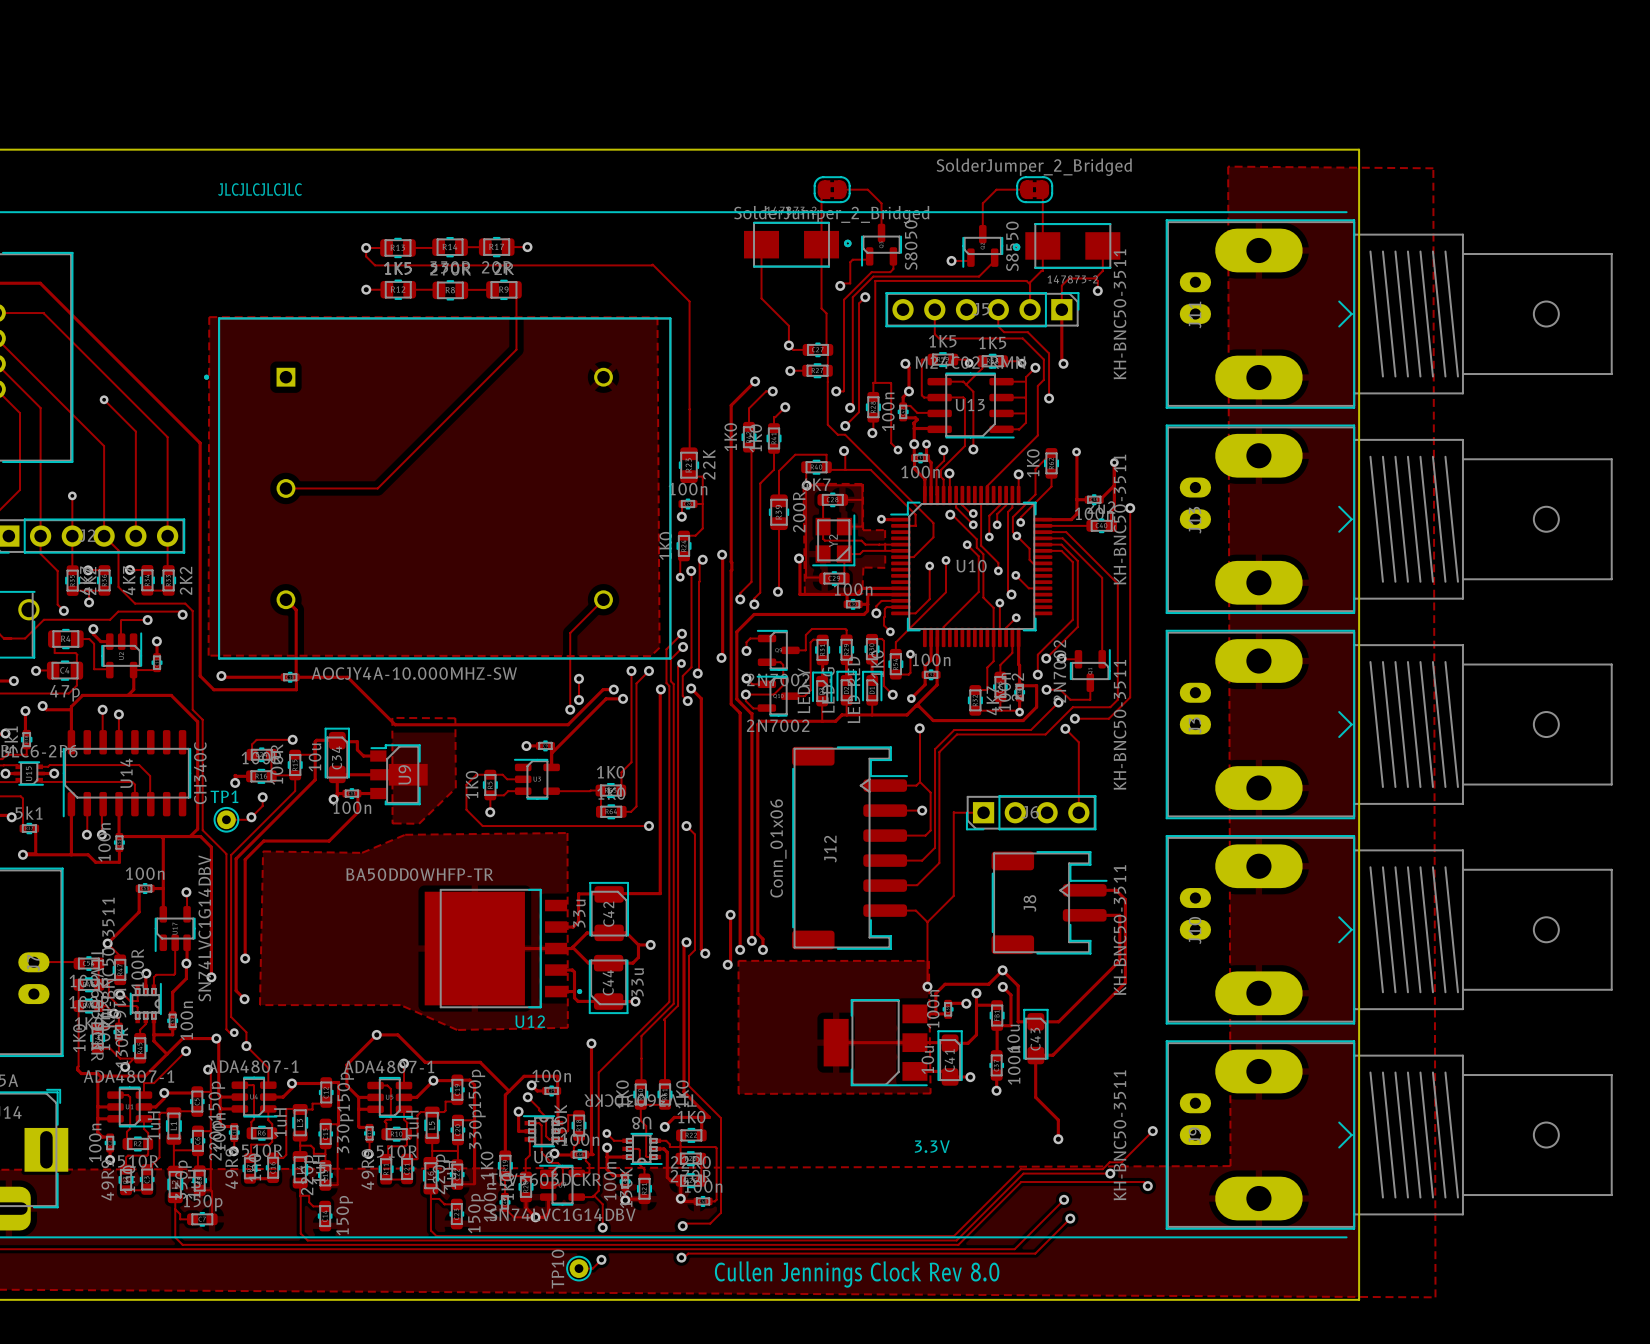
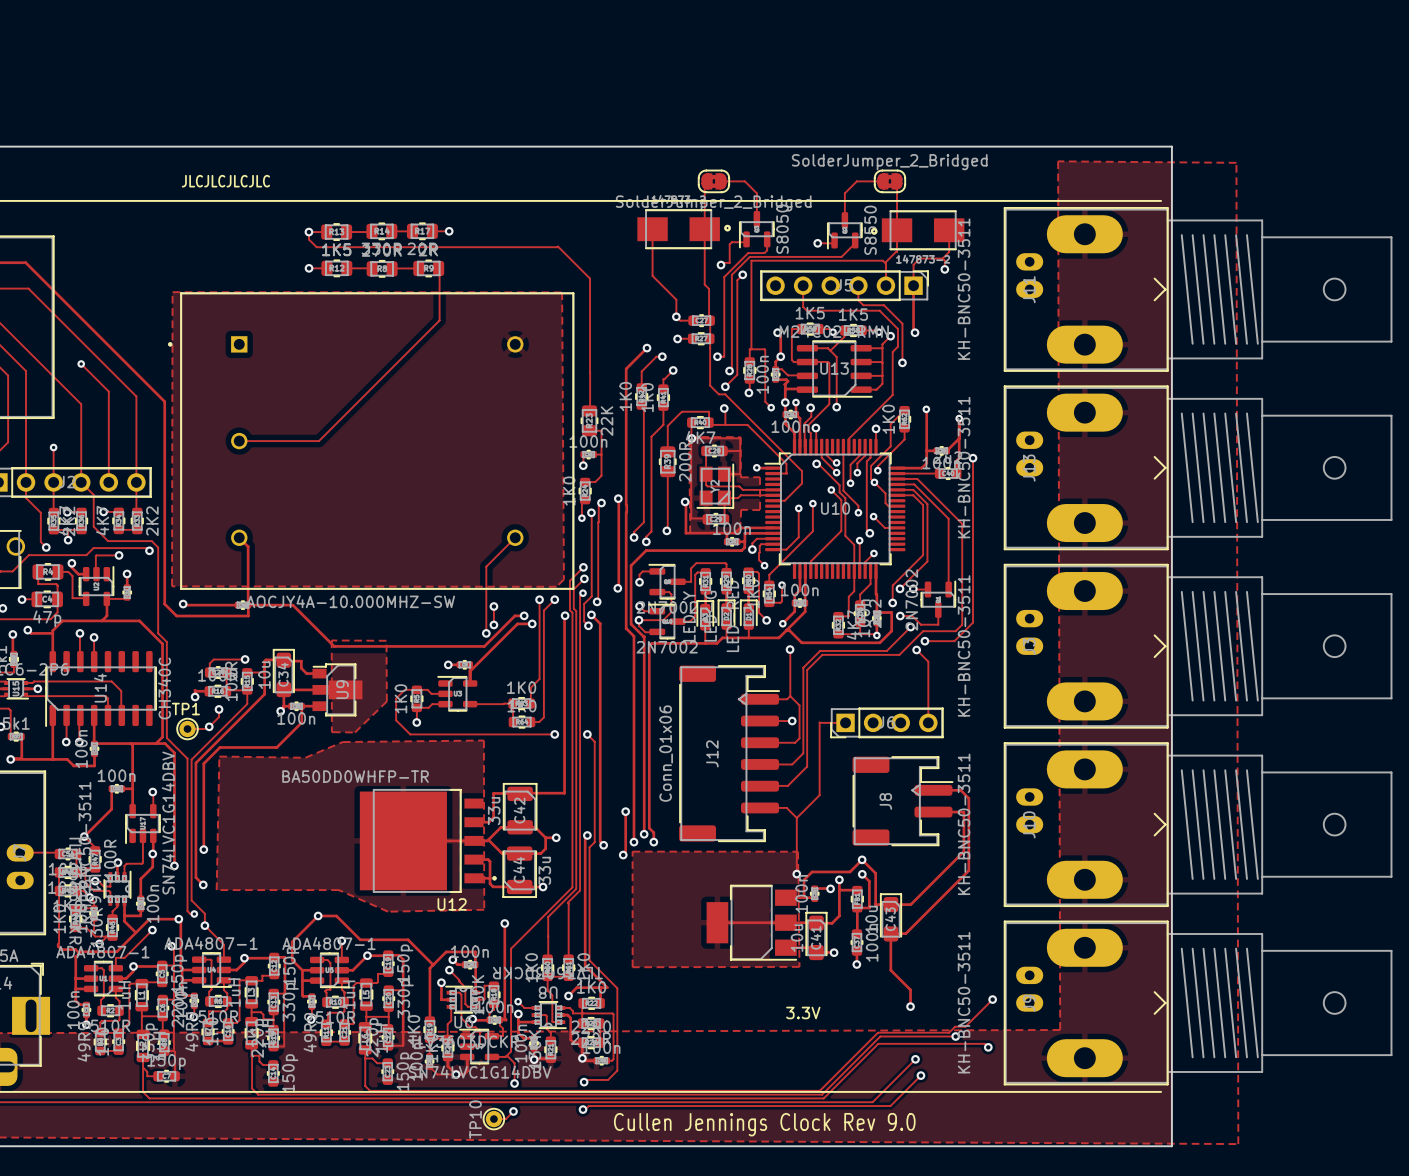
text: Cullen Jennings Clock Rev 8.0 (857, 1274) -> Cullen Jennings Clock Rev 9.0 (764, 1124)

